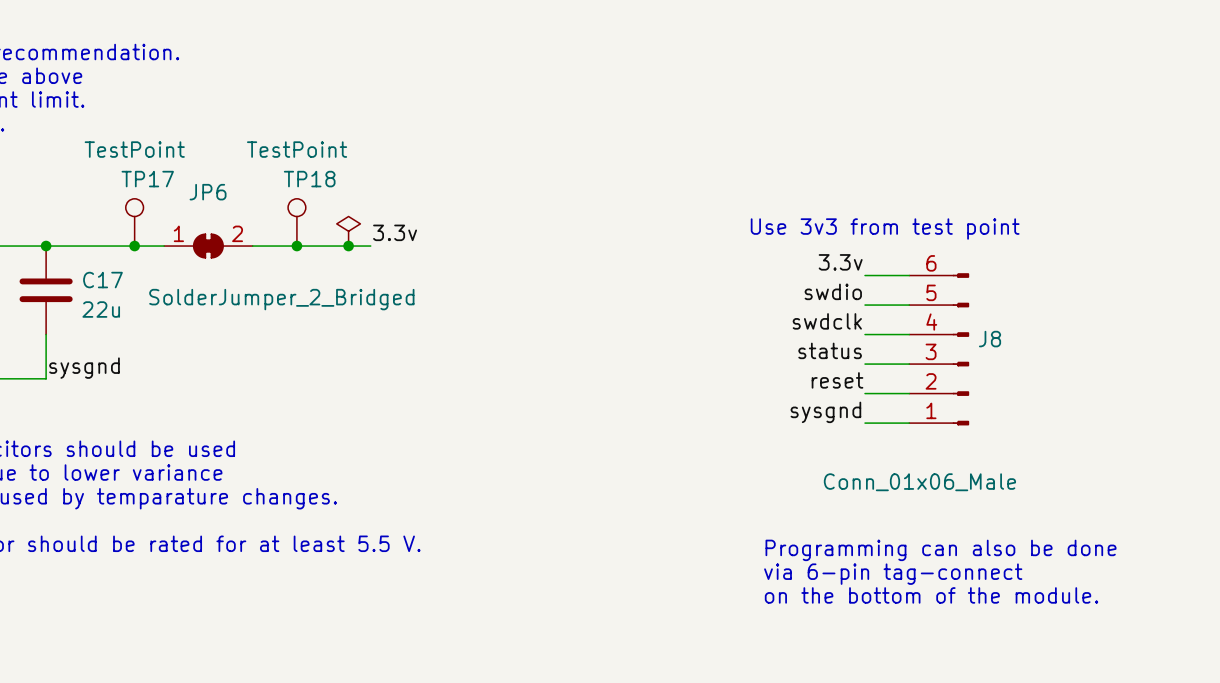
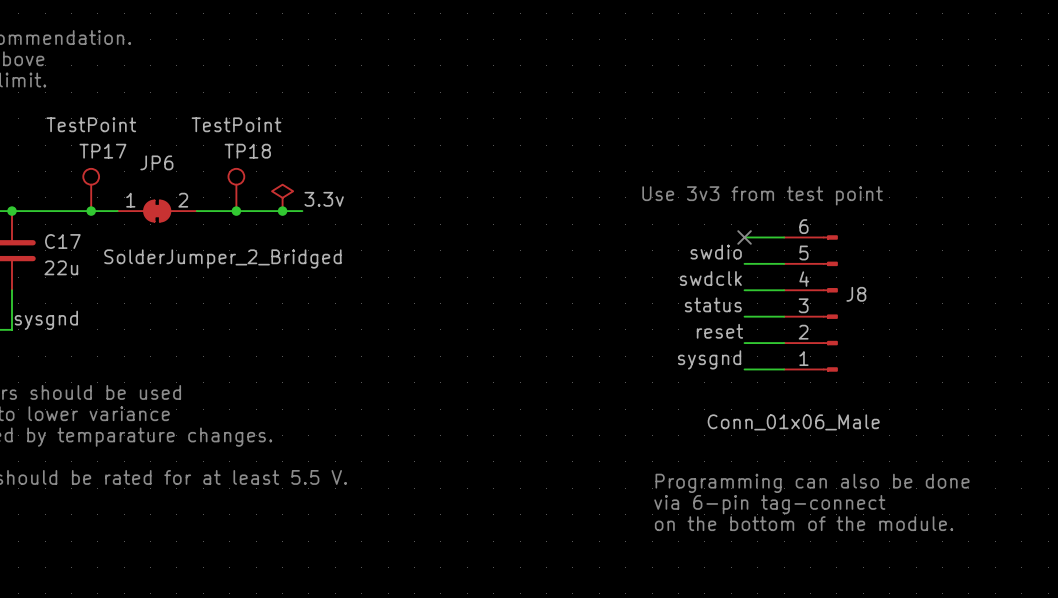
label: 3.3v (840, 262) -> none
no-connect mark: none -> (744, 237)

